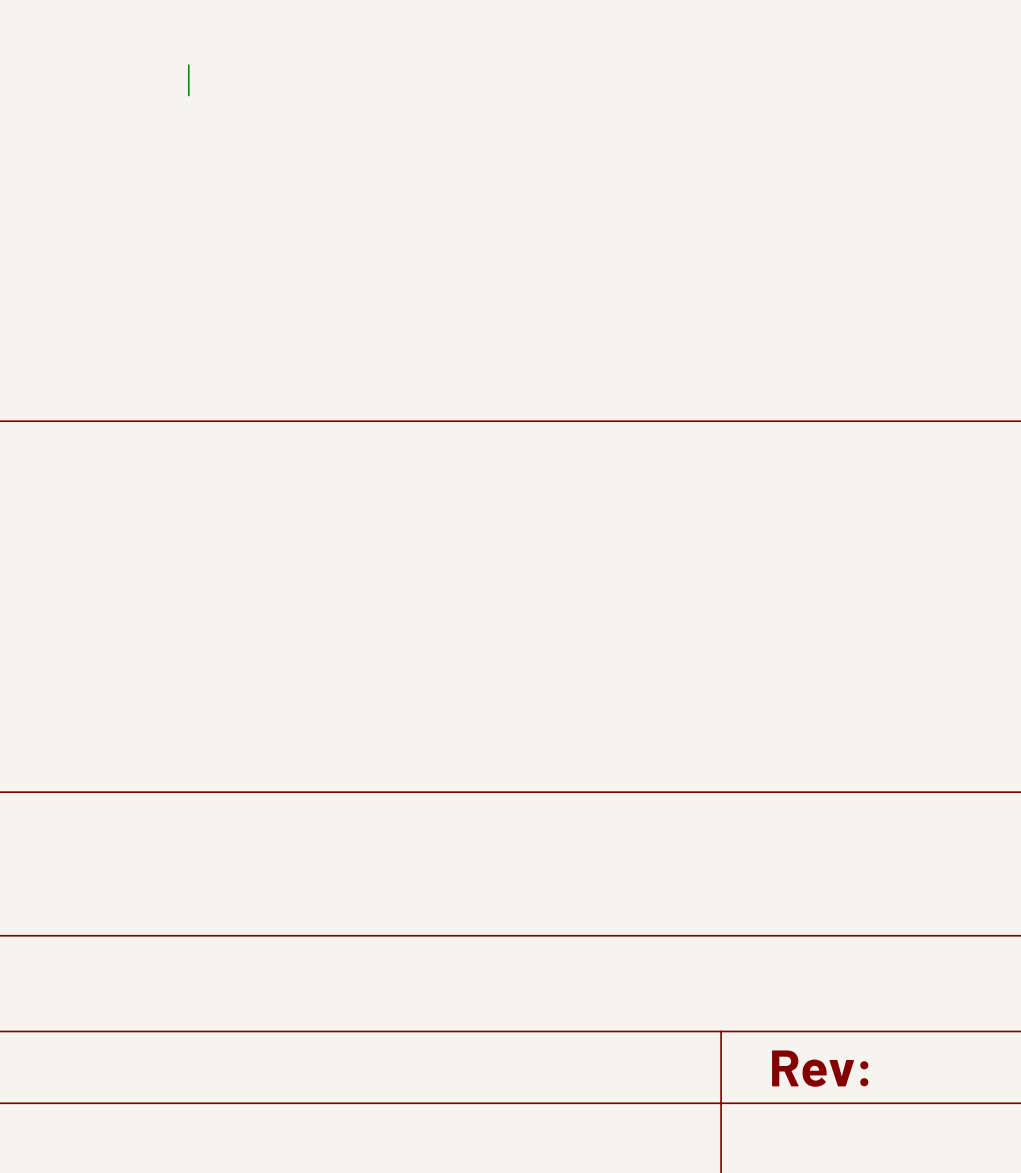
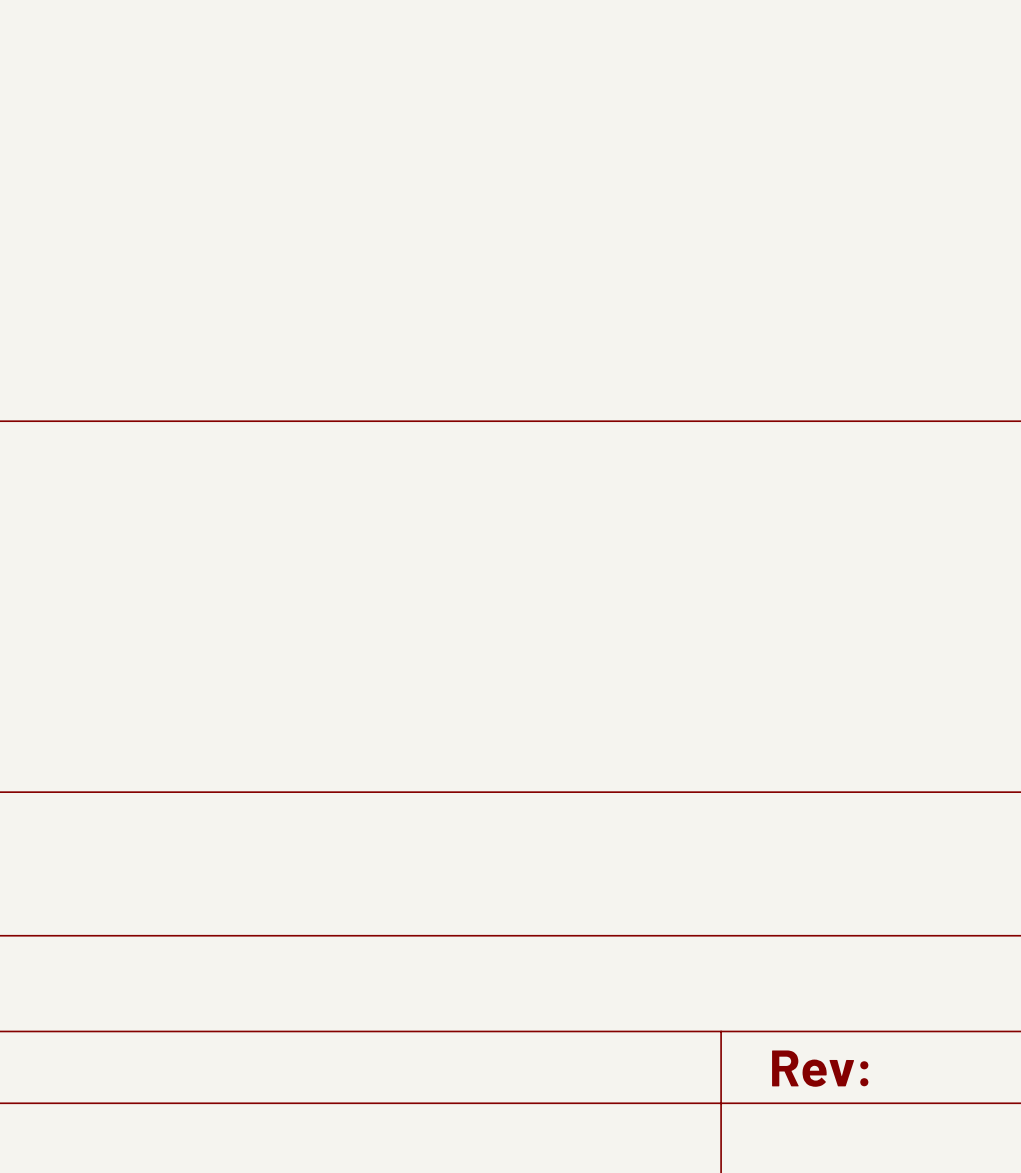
wire: (188, 65) (188, 95) -> none

